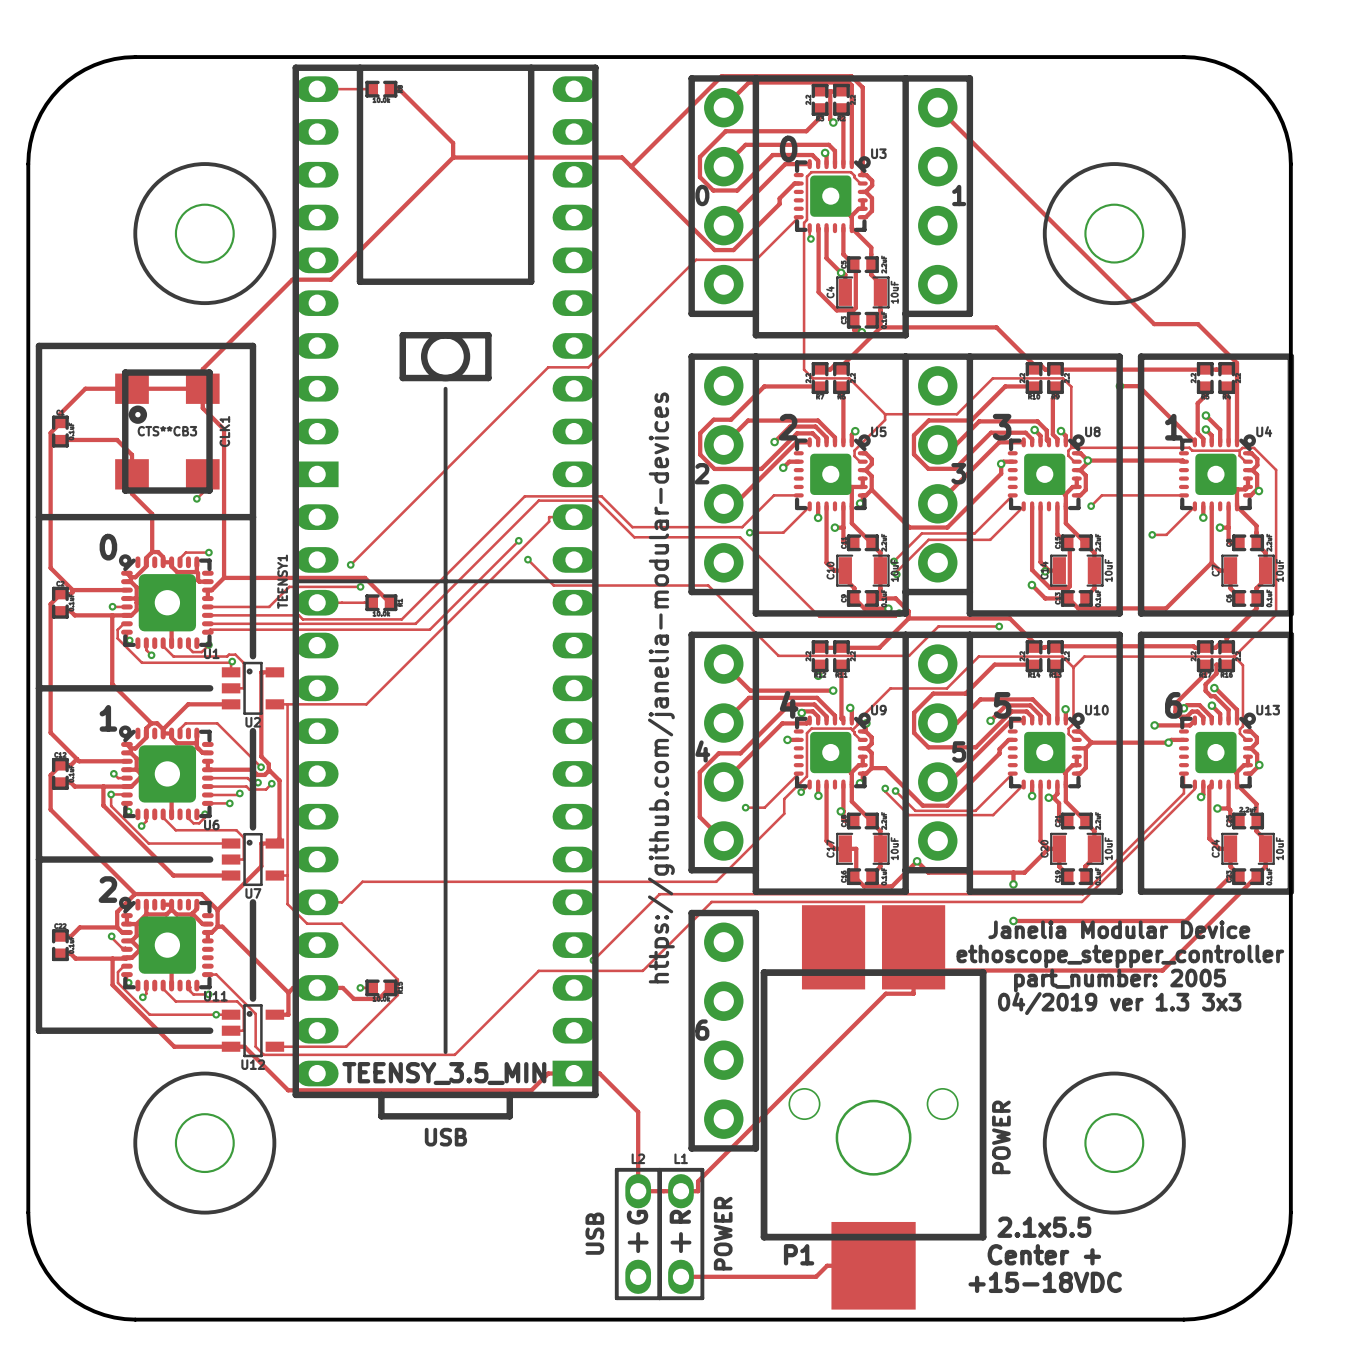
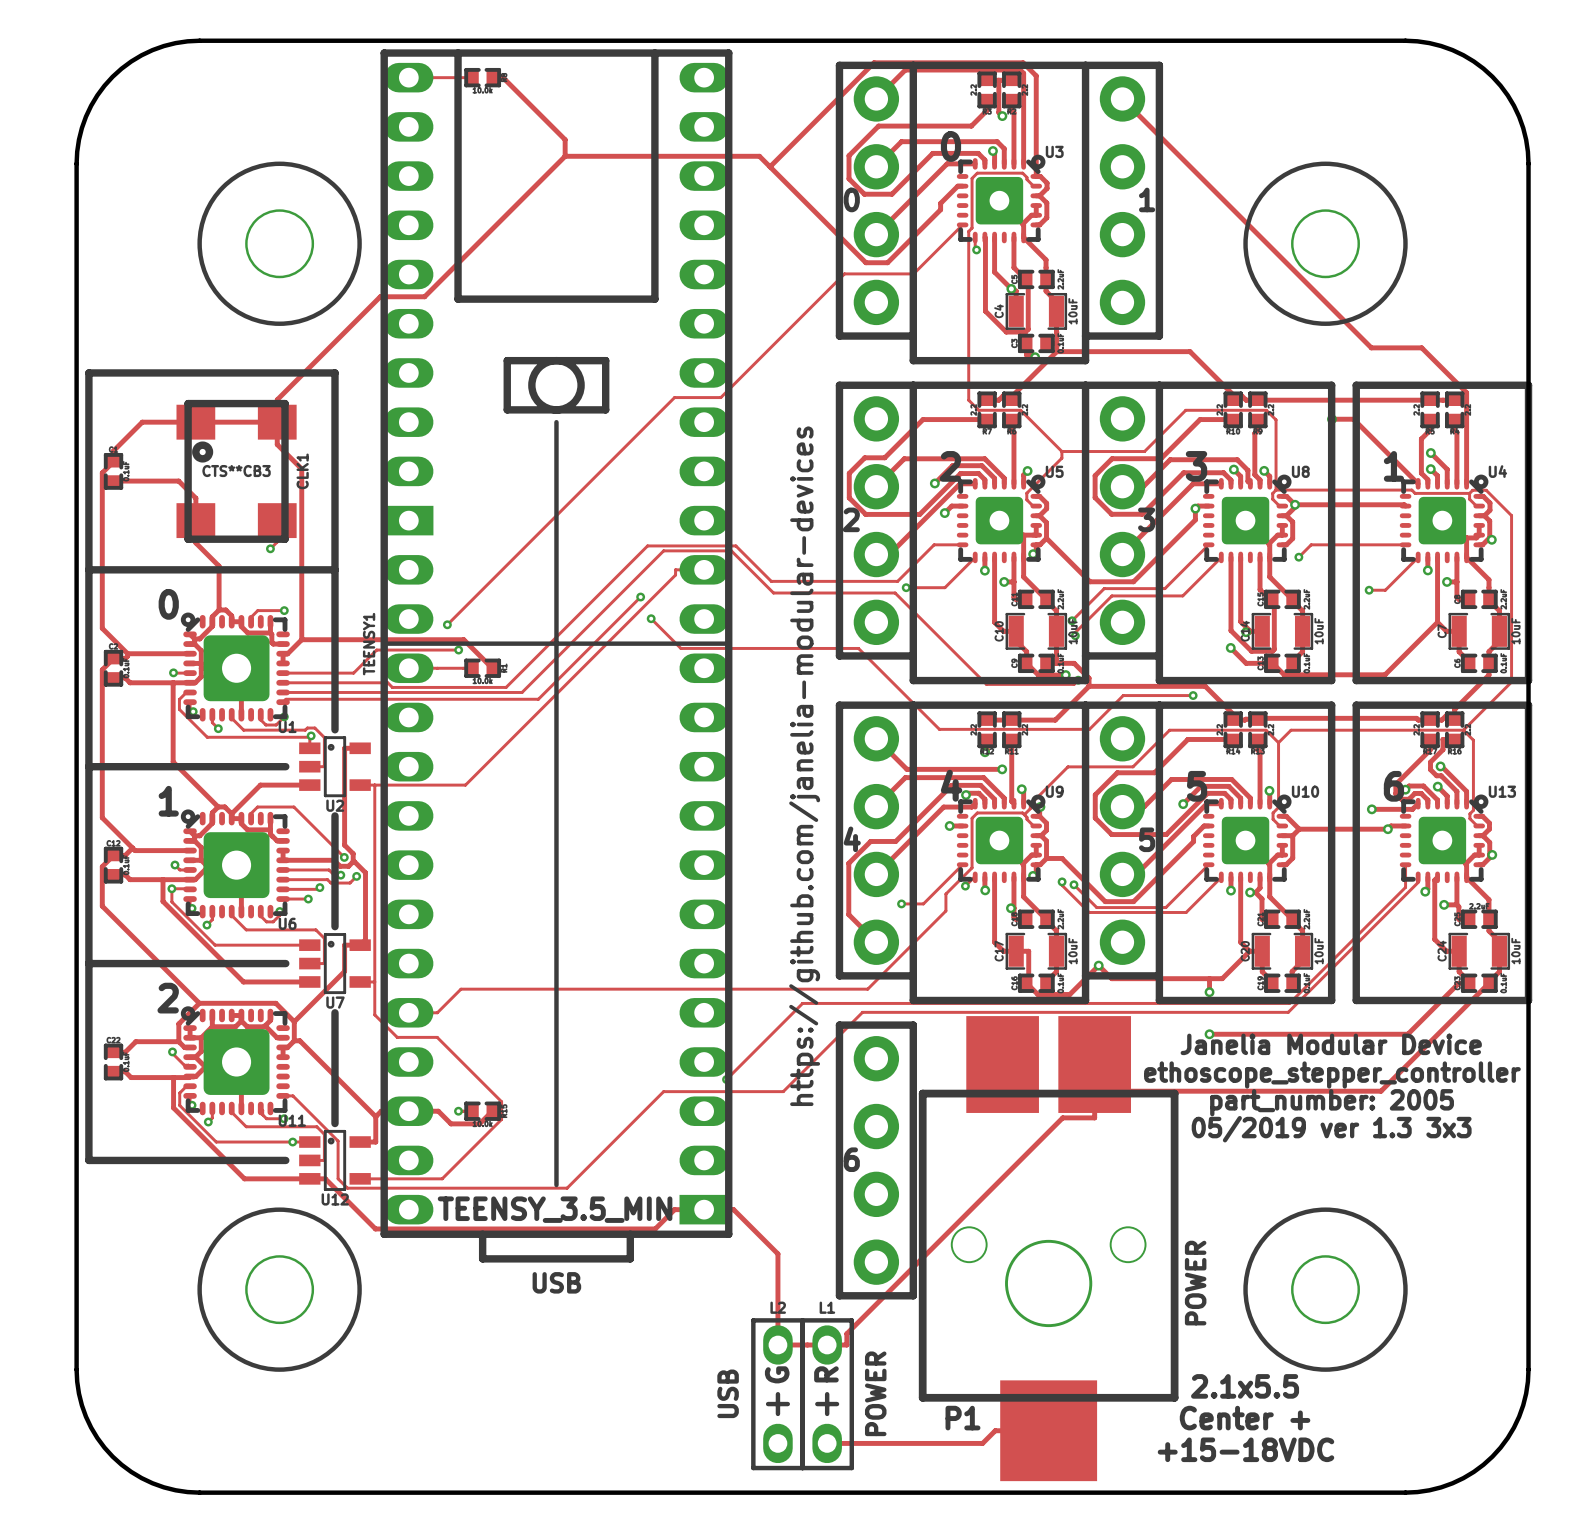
text: 04/2019 ver 1.3 3x3 (1119, 1003) -> 05/2019 ver 1.3 3x3 (1331, 1129)

